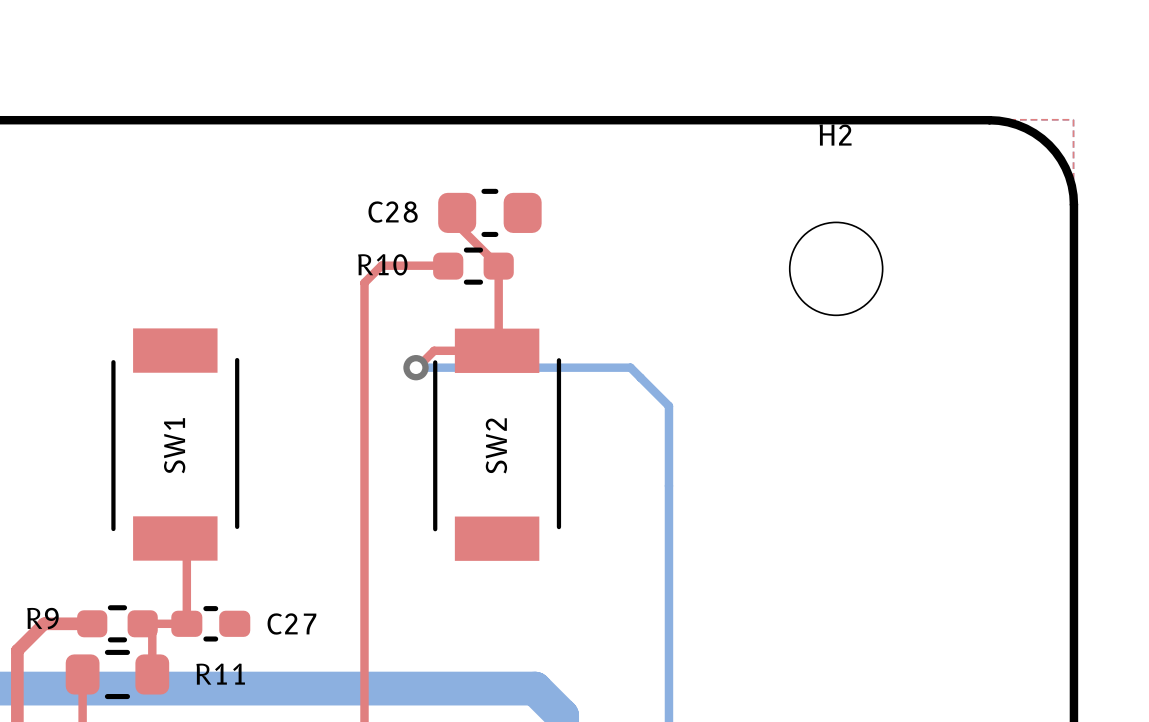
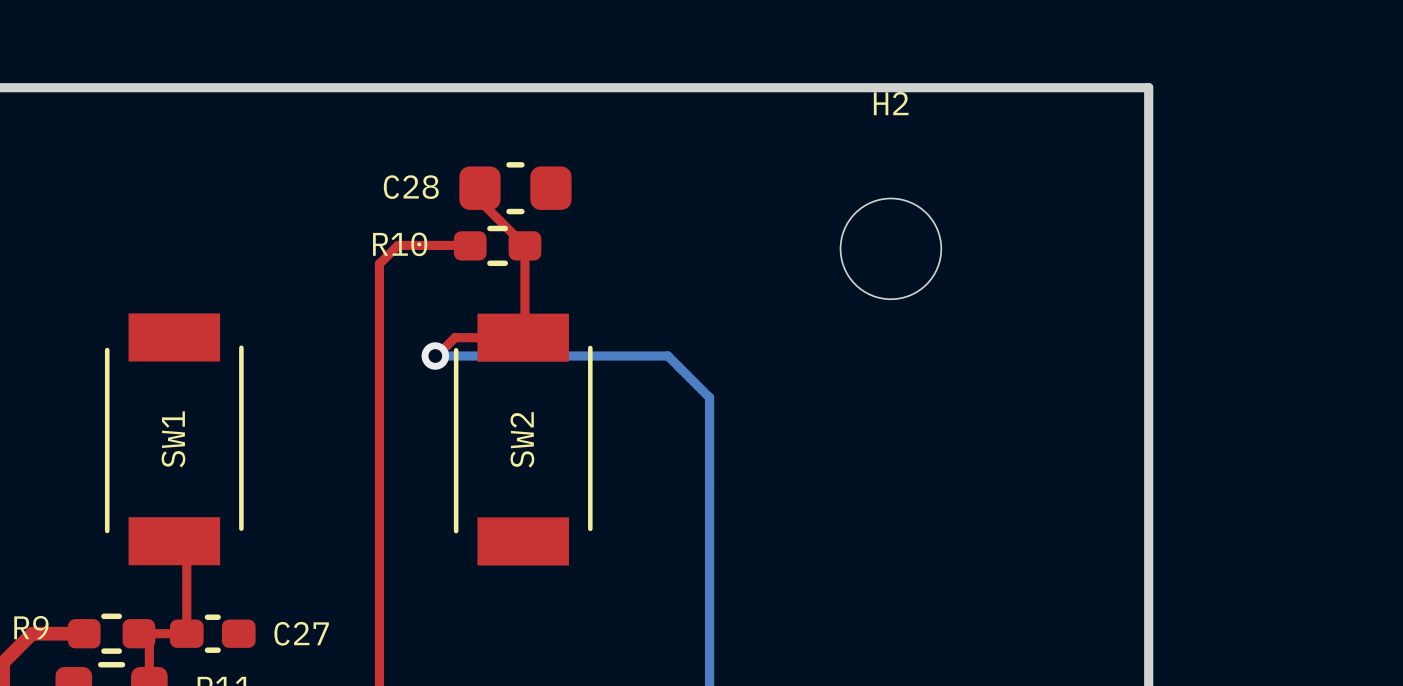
board edge: (989, 120) (1008, 122) (1026, 128) (1049, 144) (1065, 168) (1071, 185) (1073, 204) -> (1057, 87) (1148, 87) (1148, 179)

